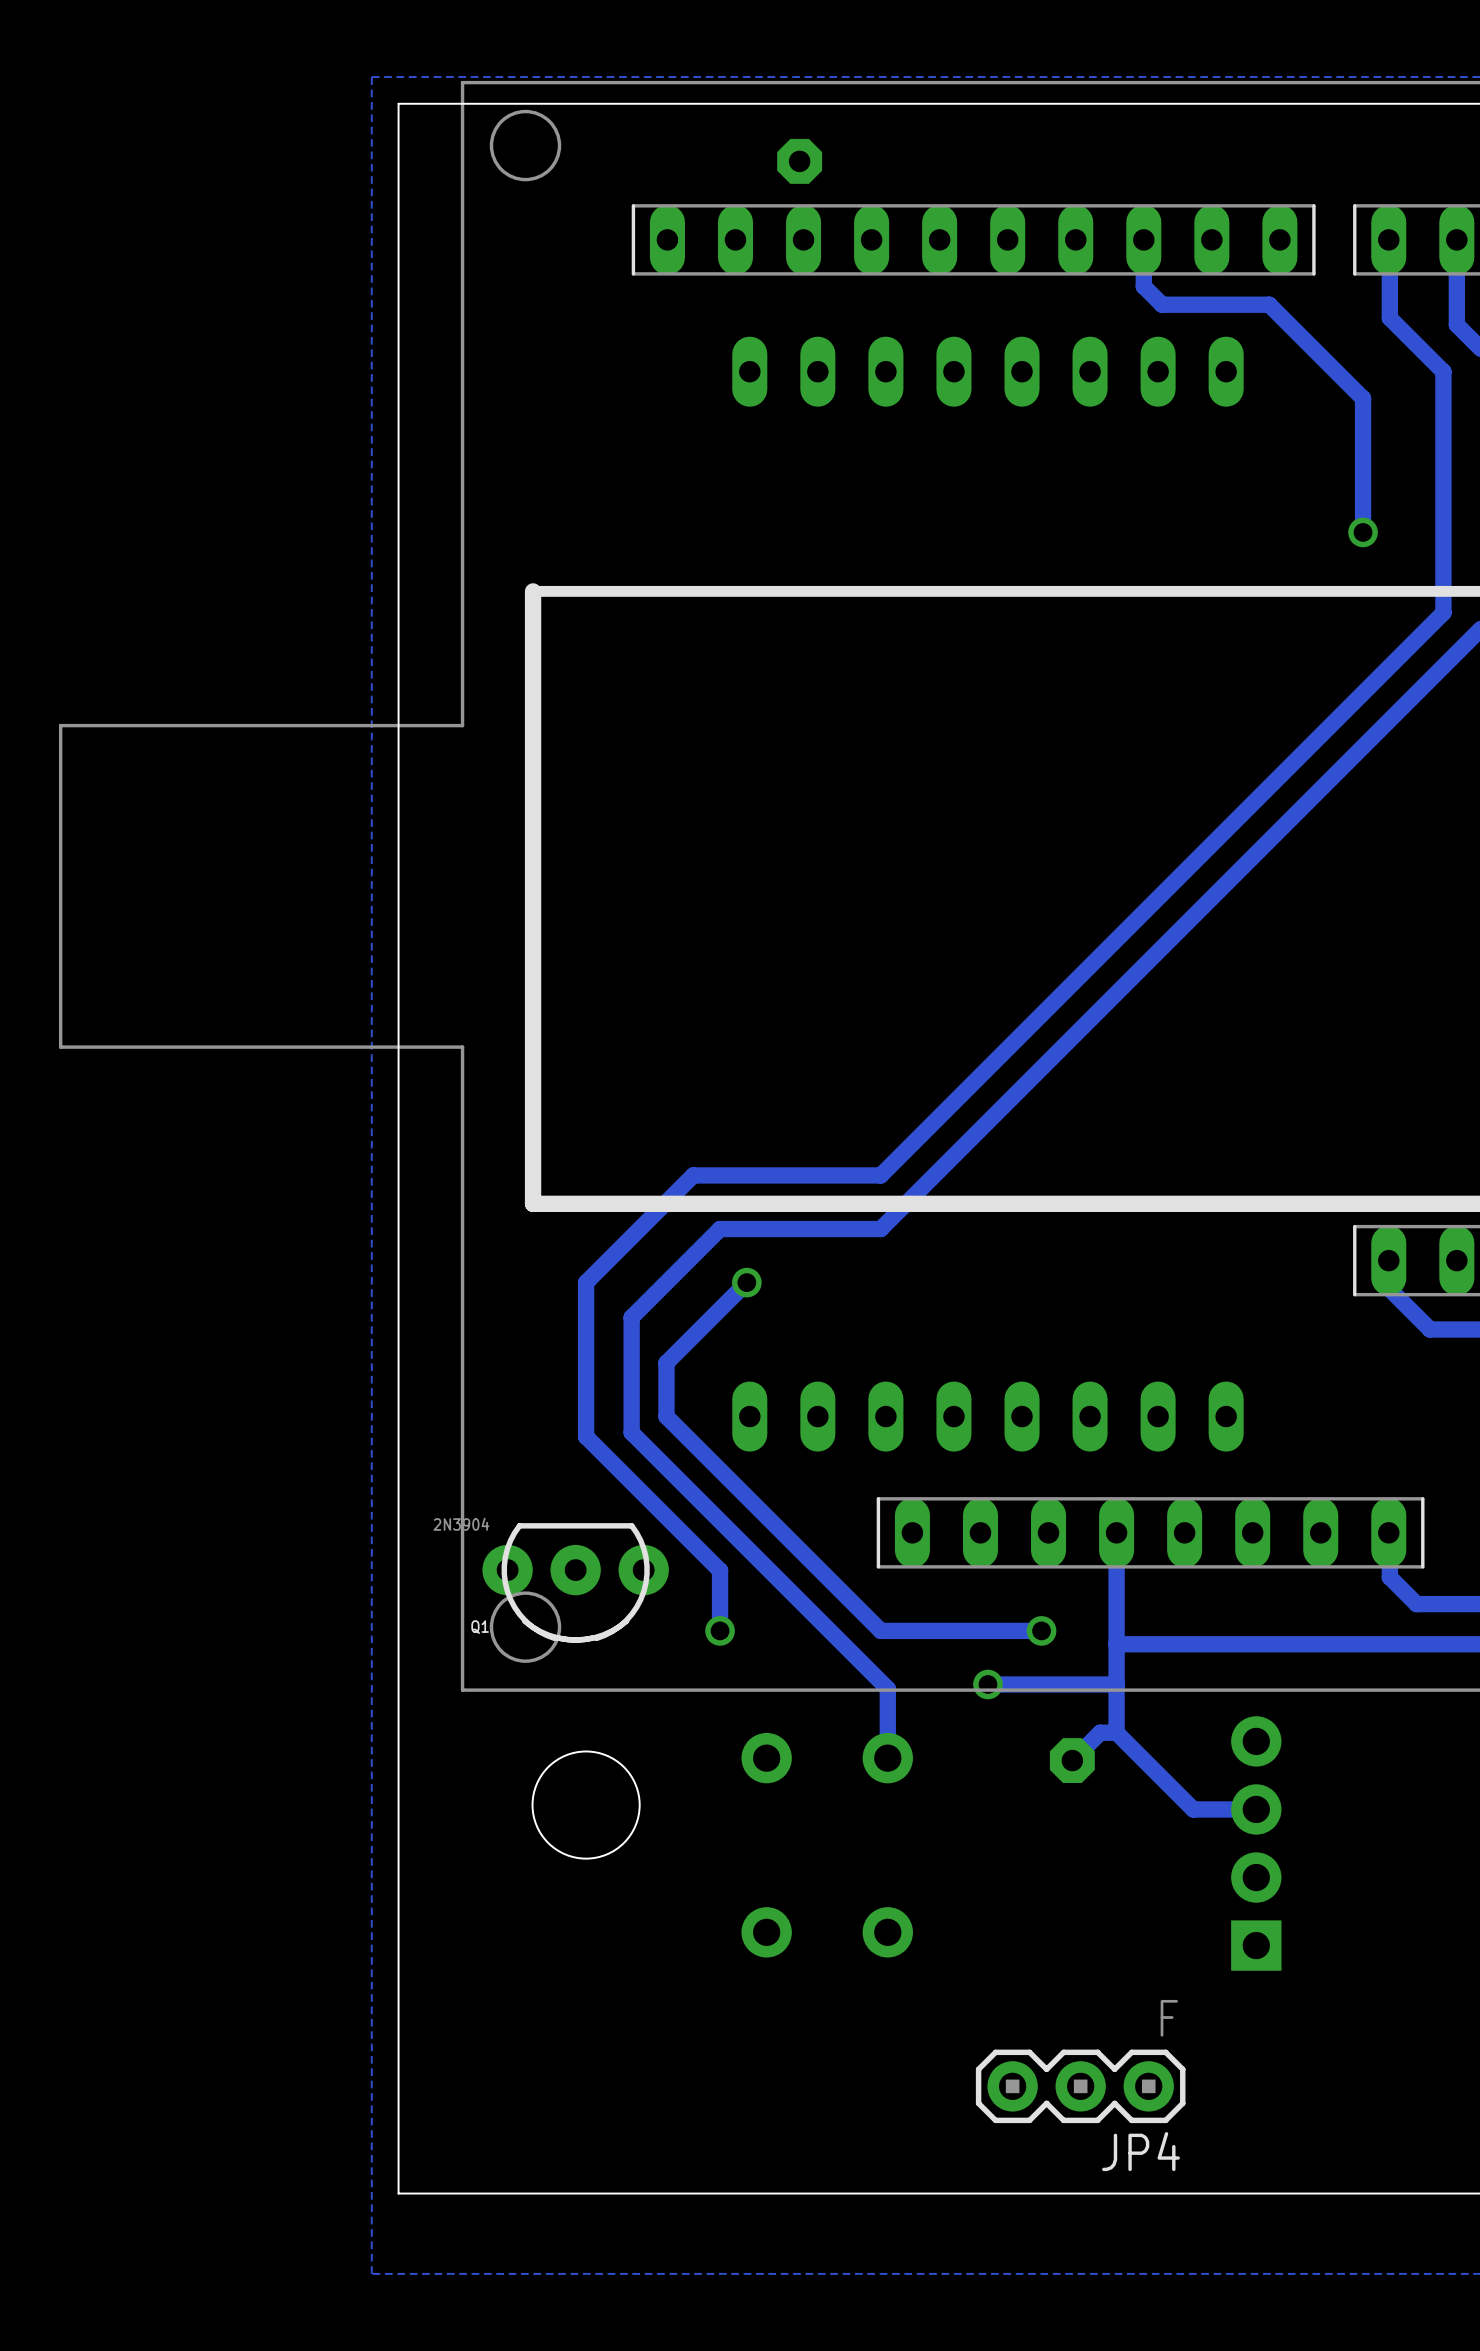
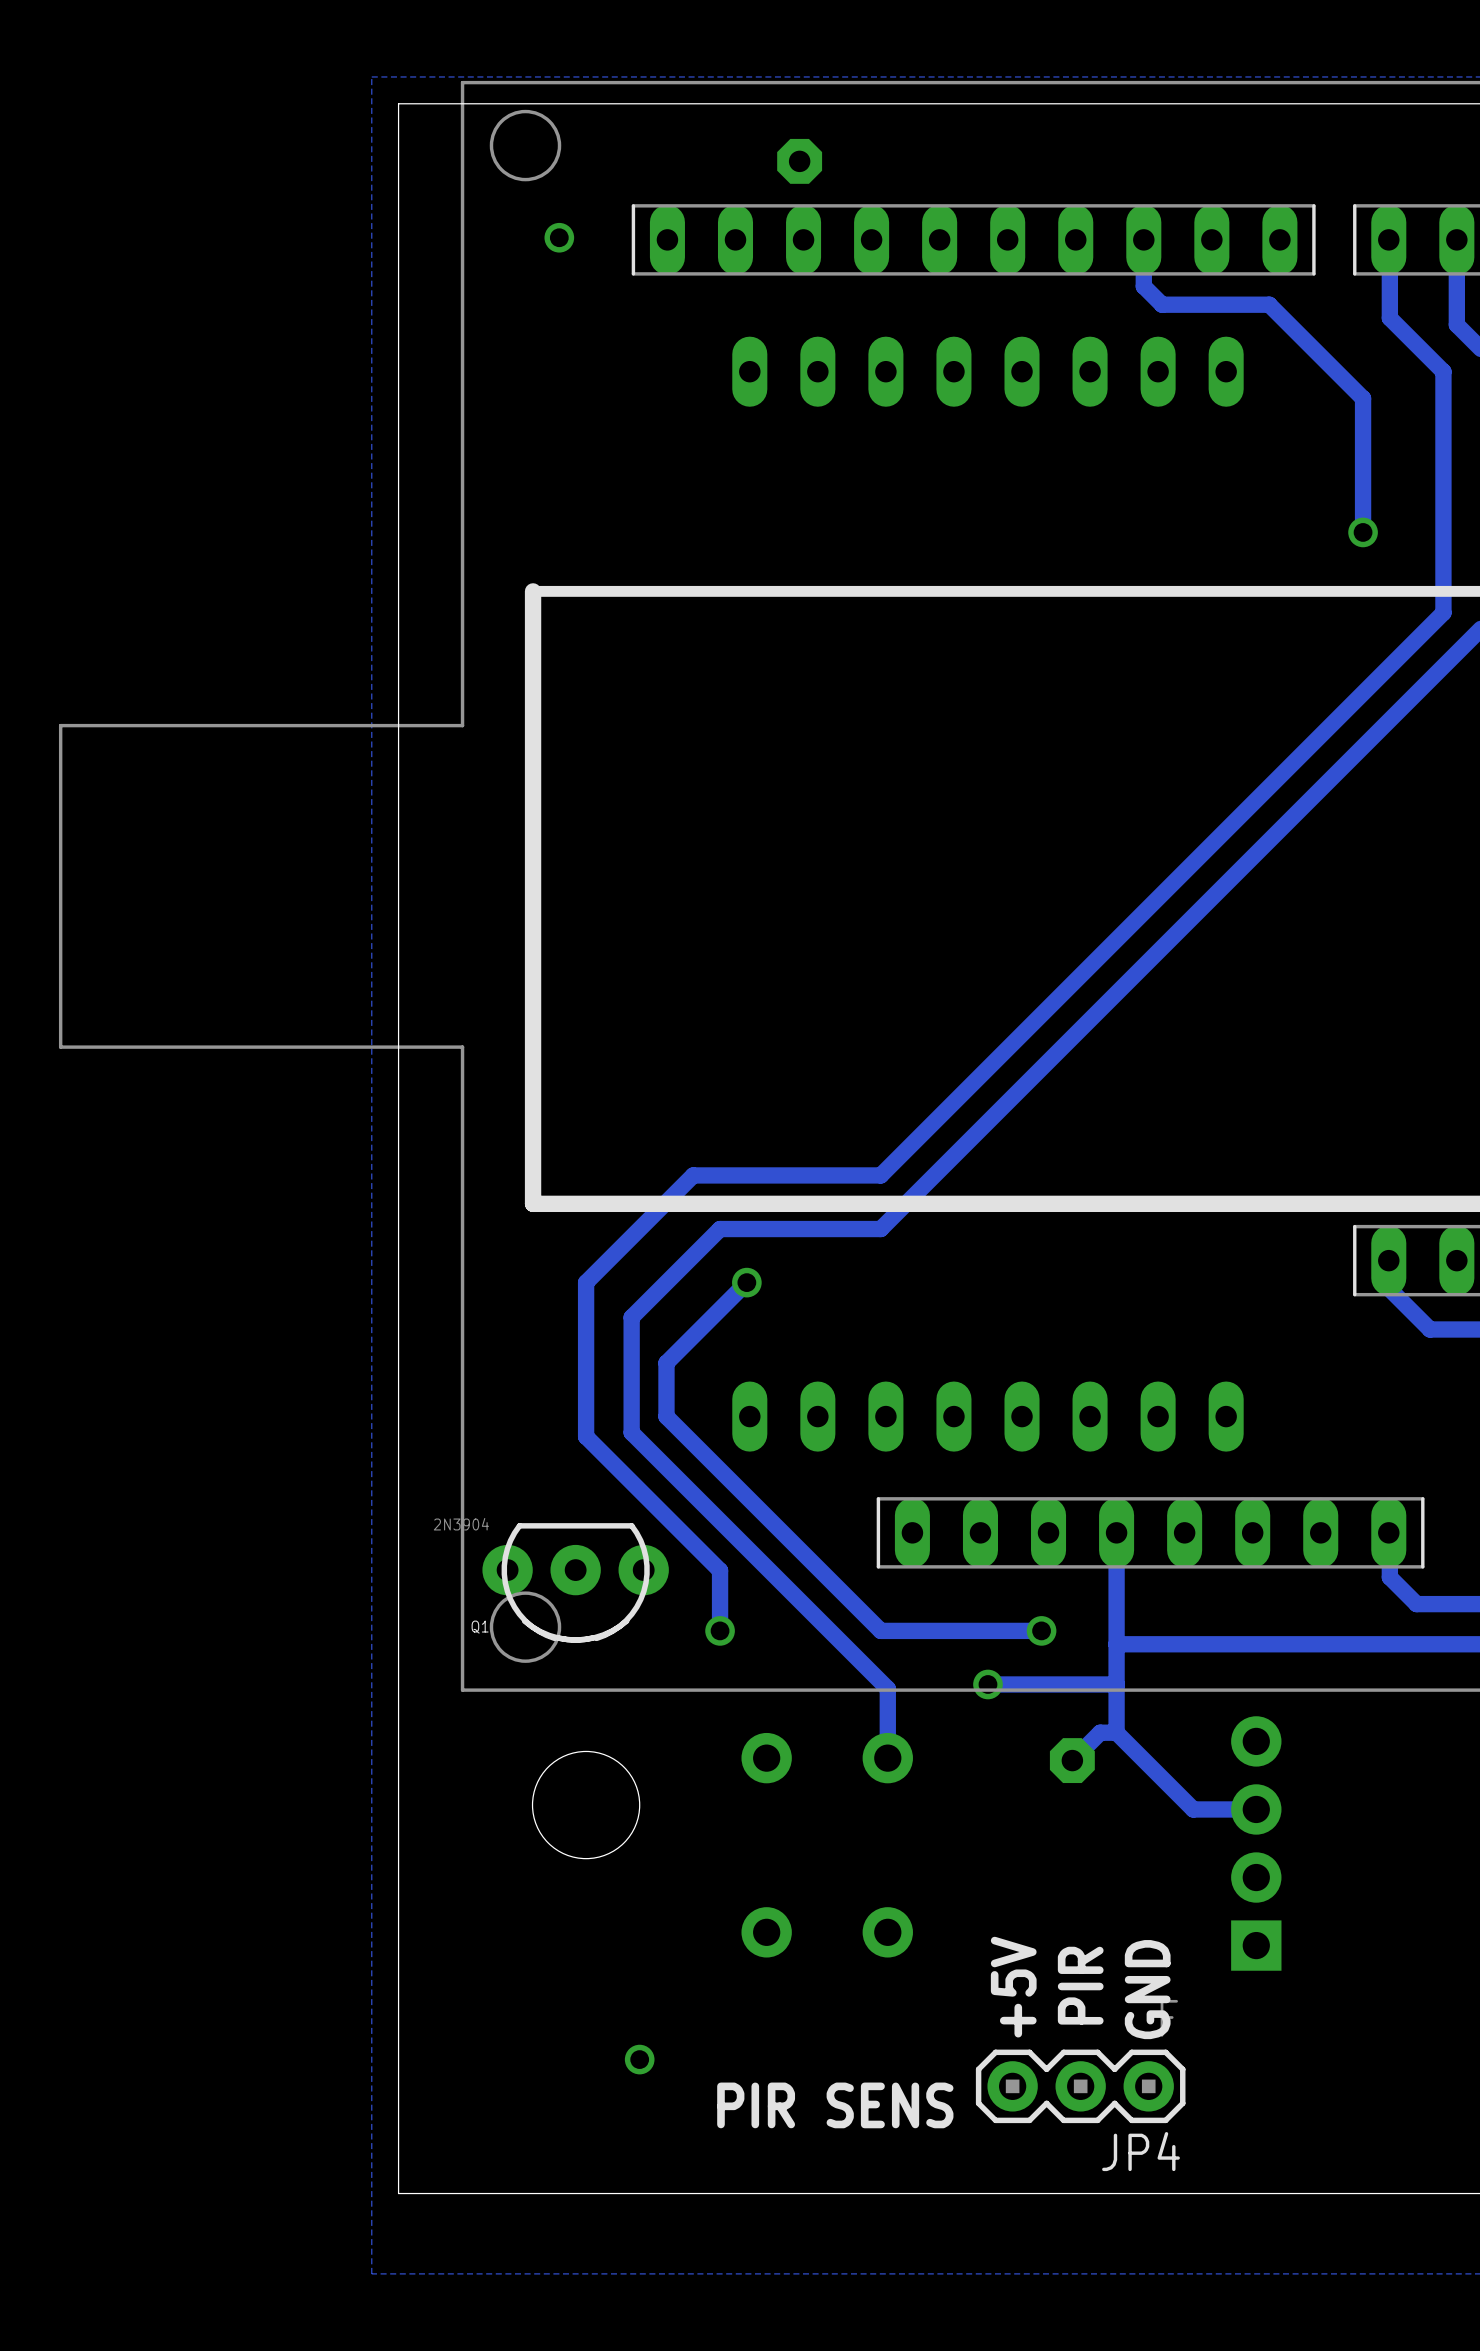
via: none -> (559, 237)
text: none -> PIR (1080, 1985)
text: none -> +5V (1013, 1987)
text: none -> GND (1147, 1989)
via: none -> (639, 2059)
text: none -> PIR SENS (835, 2105)

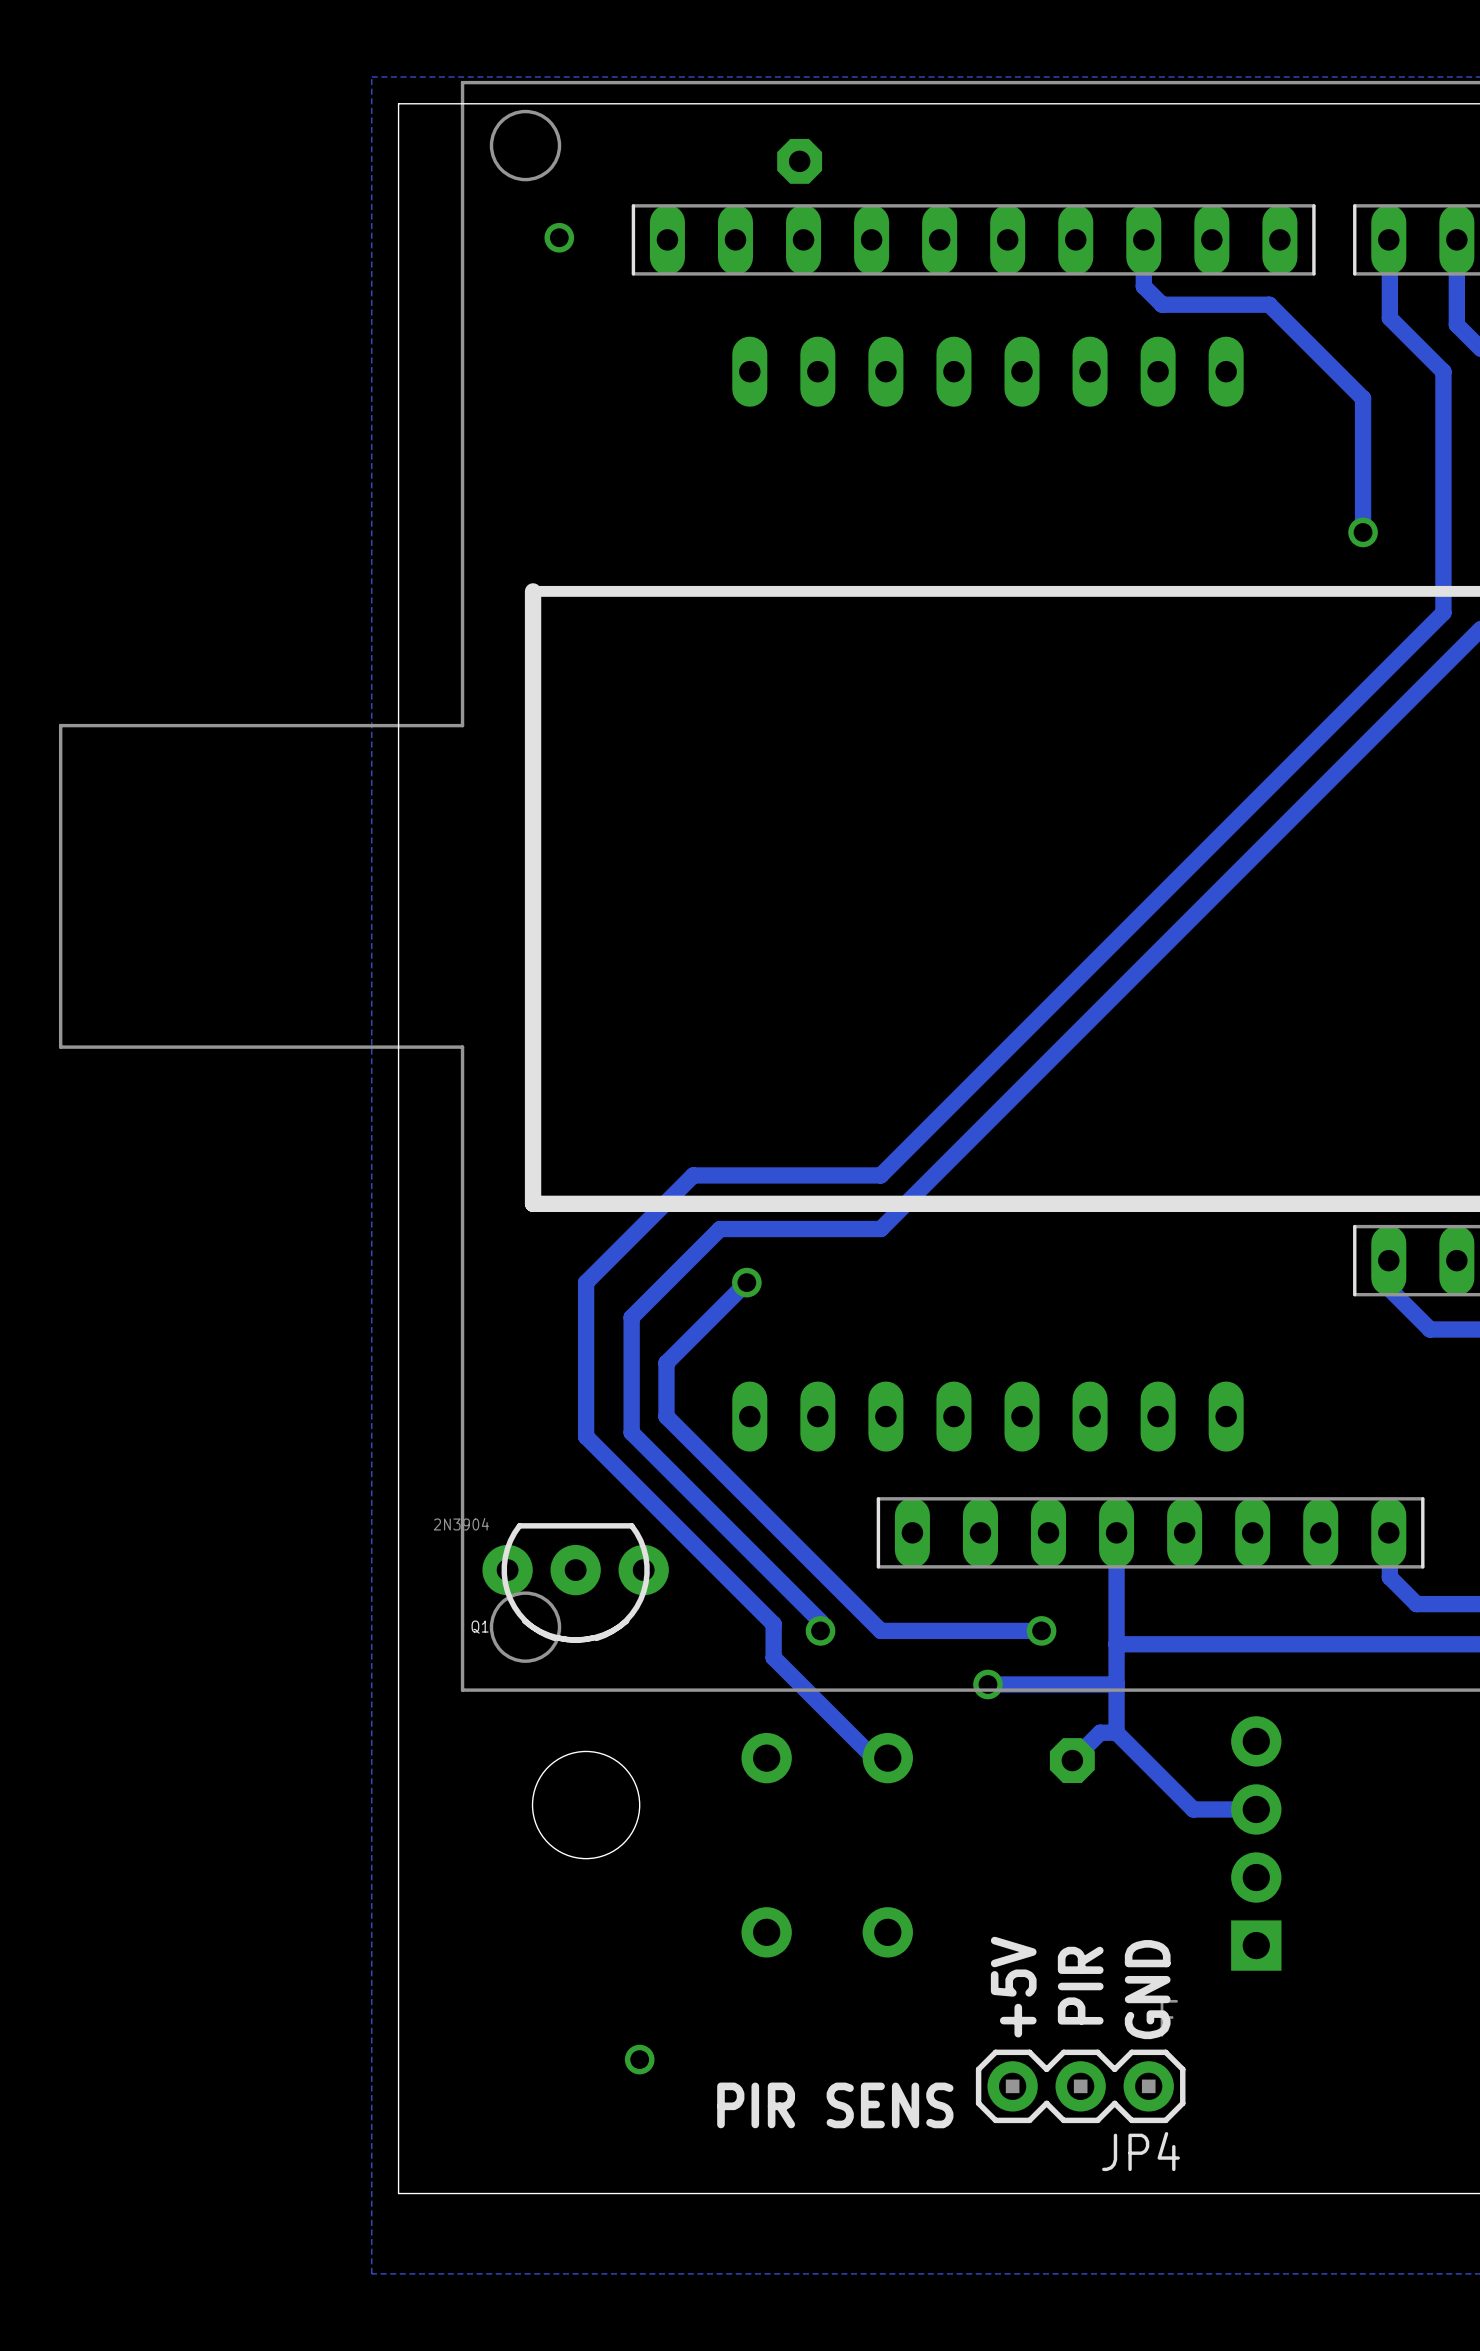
track: (720, 1570) (720, 1630) -> none
track: (820, 1621) (887, 1688) (887, 1758) -> (720, 1570) (773, 1624) (773, 1657) (874, 1758) (887, 1758)
via position: (720, 1630) -> (820, 1630)

